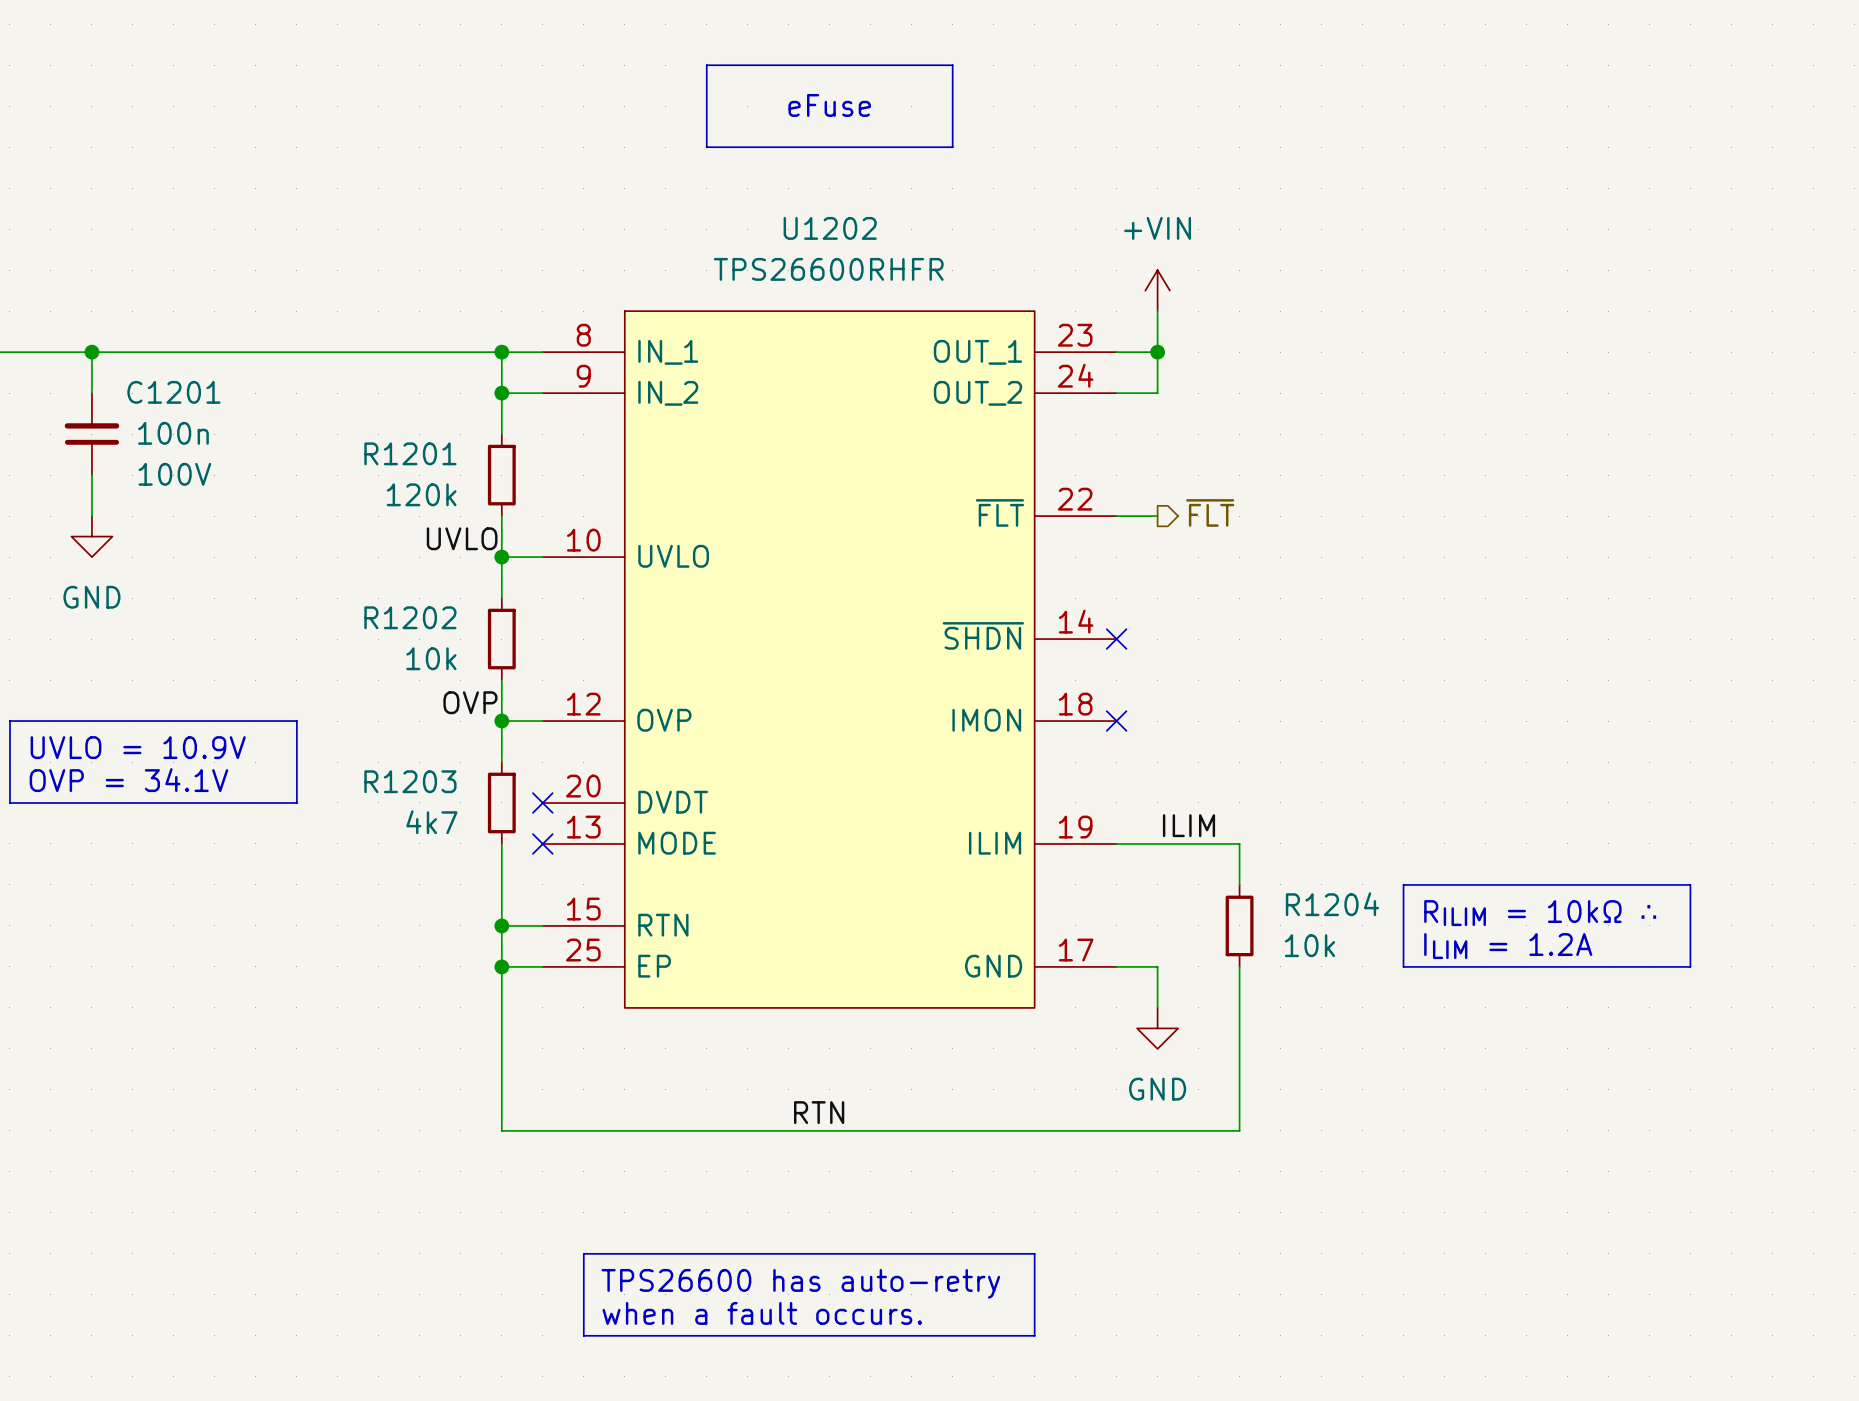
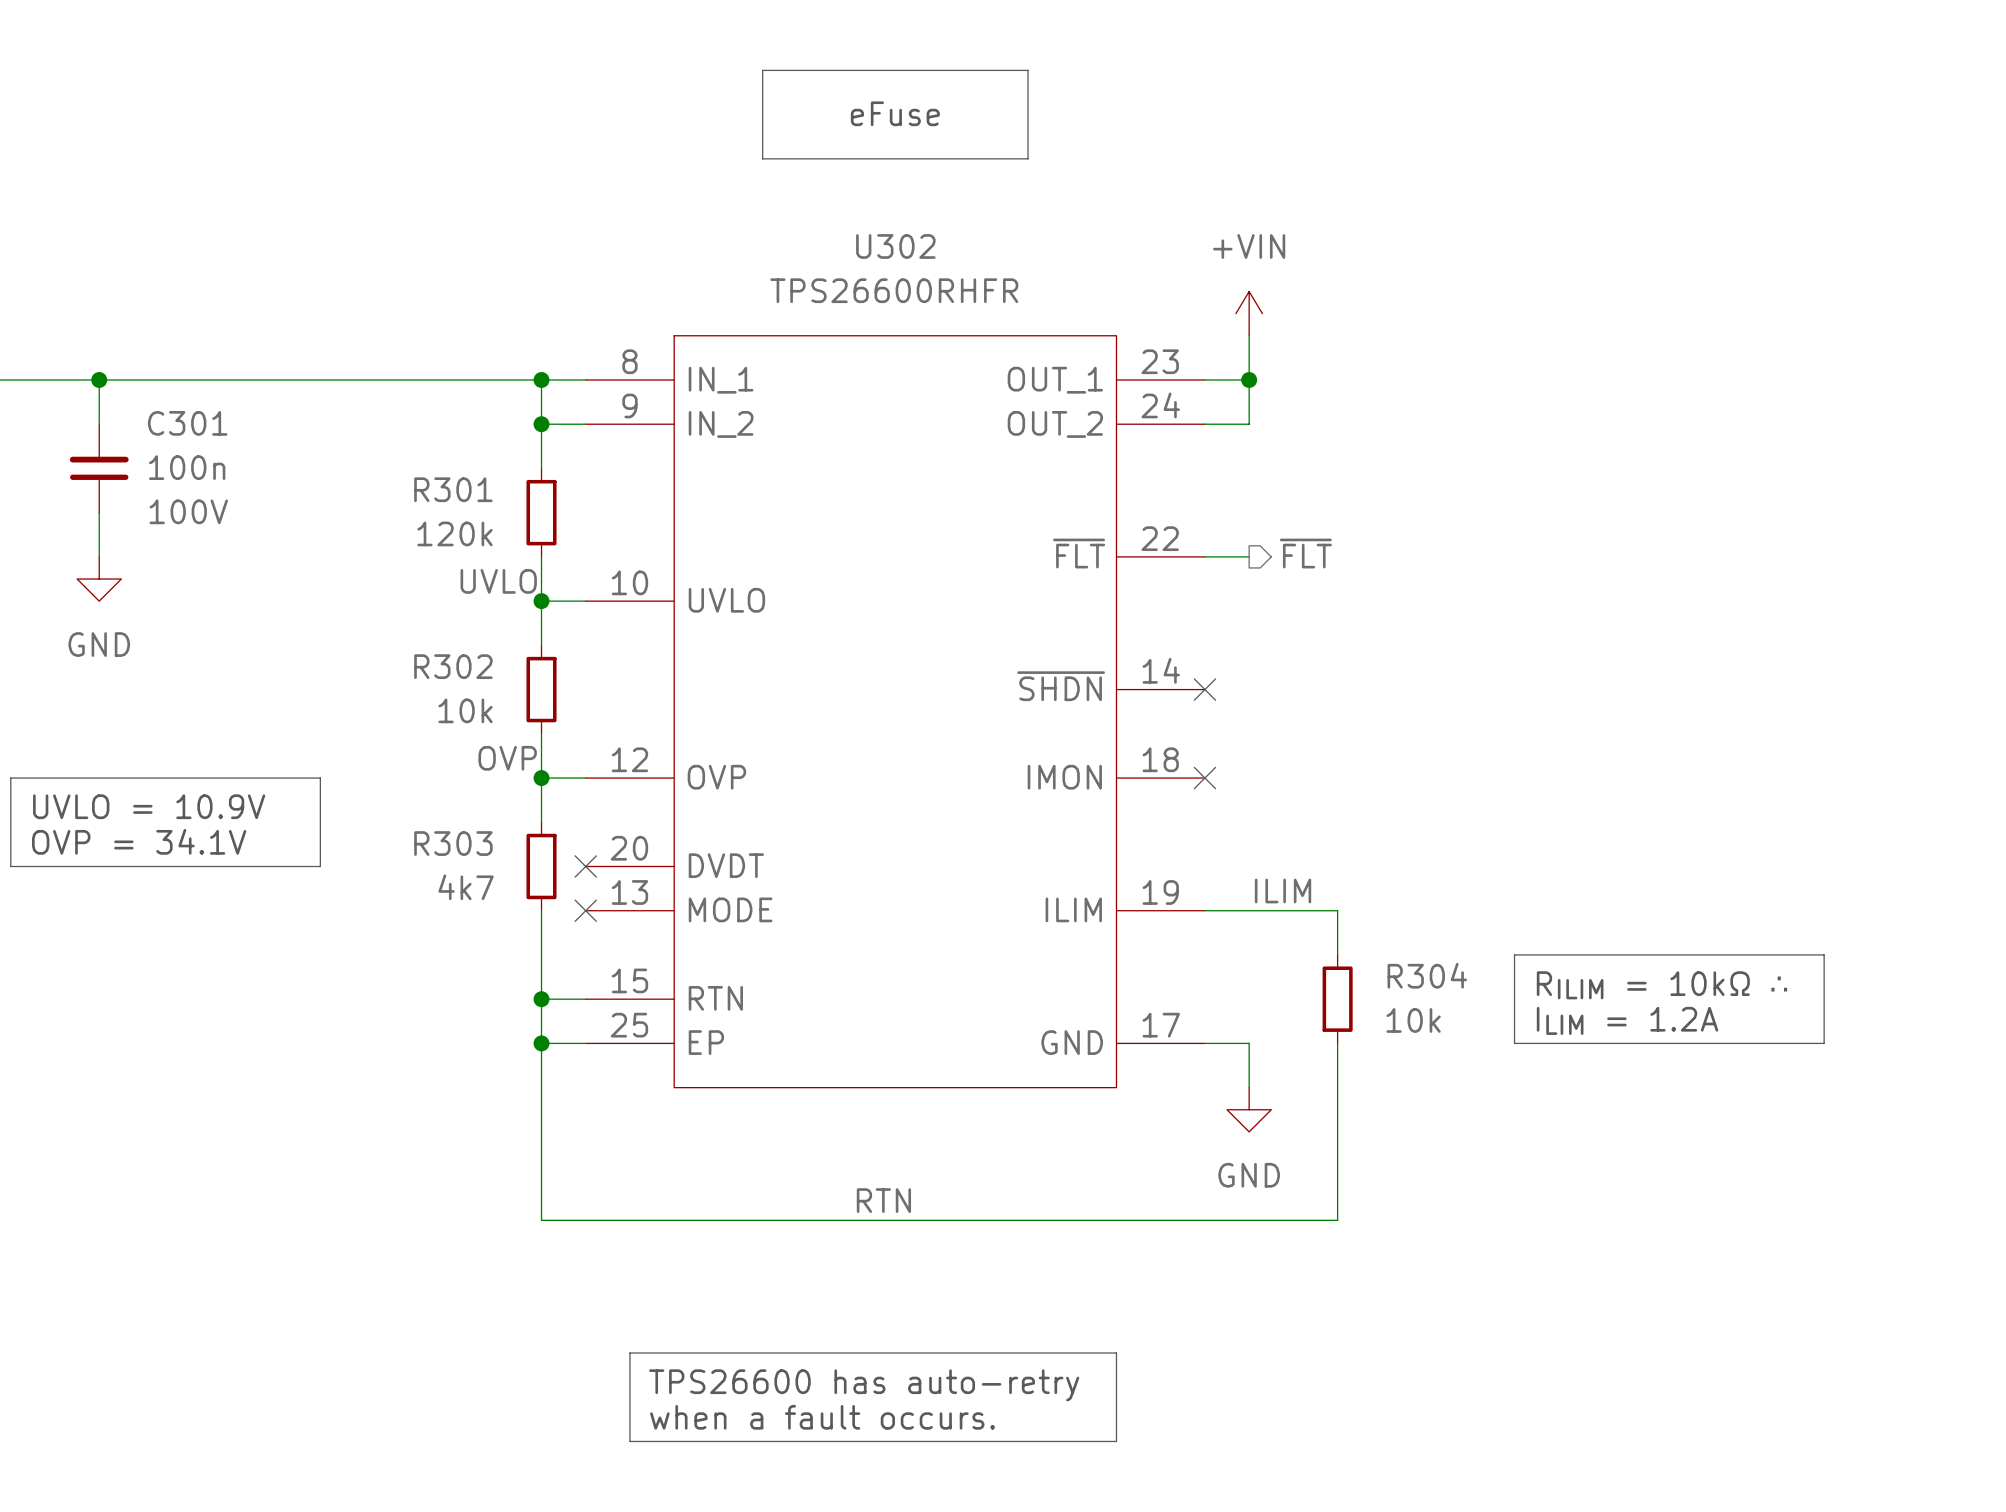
U1202 name: U1202 (830, 228) -> U302 (895, 246)
C1201 name: C1201 (173, 392) -> C301 (187, 423)
R1201 name: R1201 (410, 453) -> R301 (453, 489)
R1202 name: R1202 (410, 617) -> R302 (453, 666)
R1203 name: R1203 (410, 781) -> R303 (453, 843)
R1204 name: R1204 (1332, 904) -> R304 (1427, 975)

